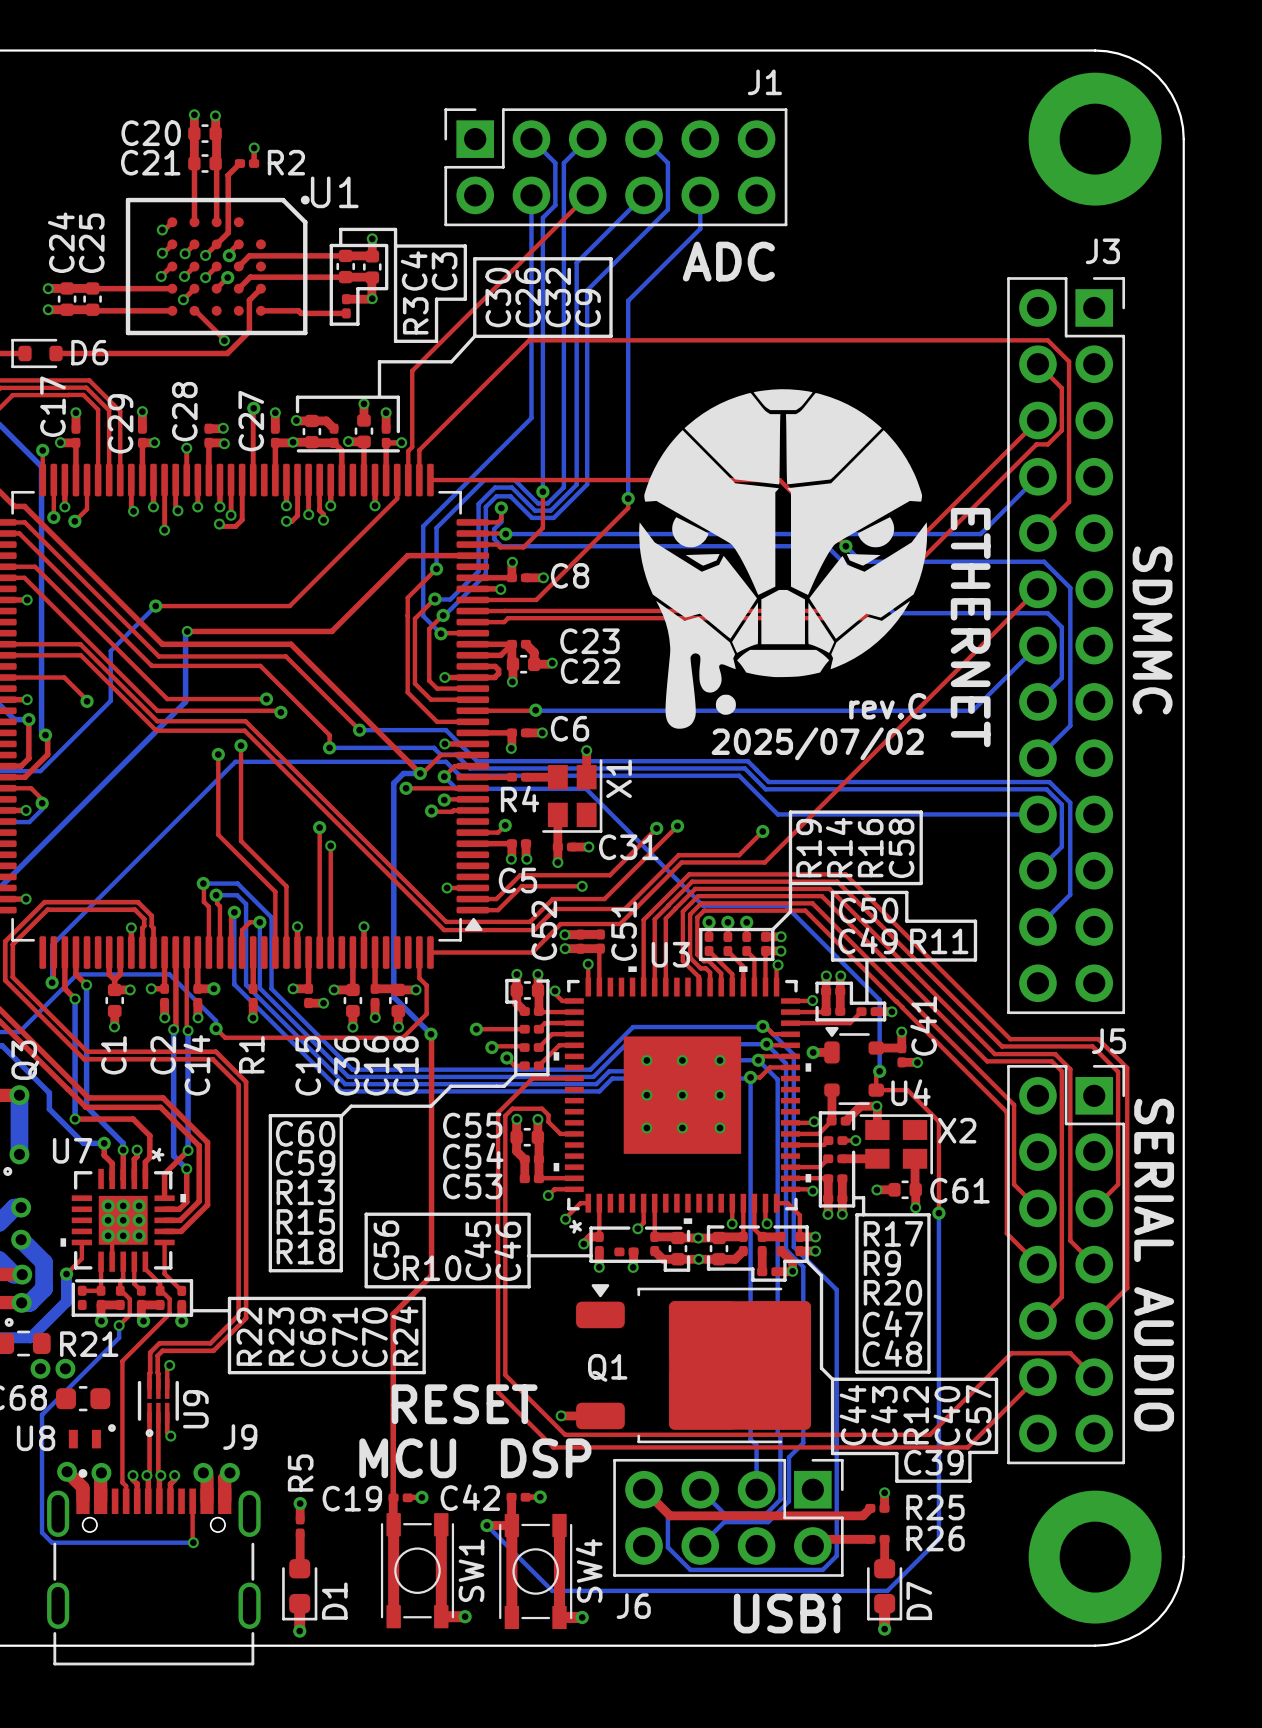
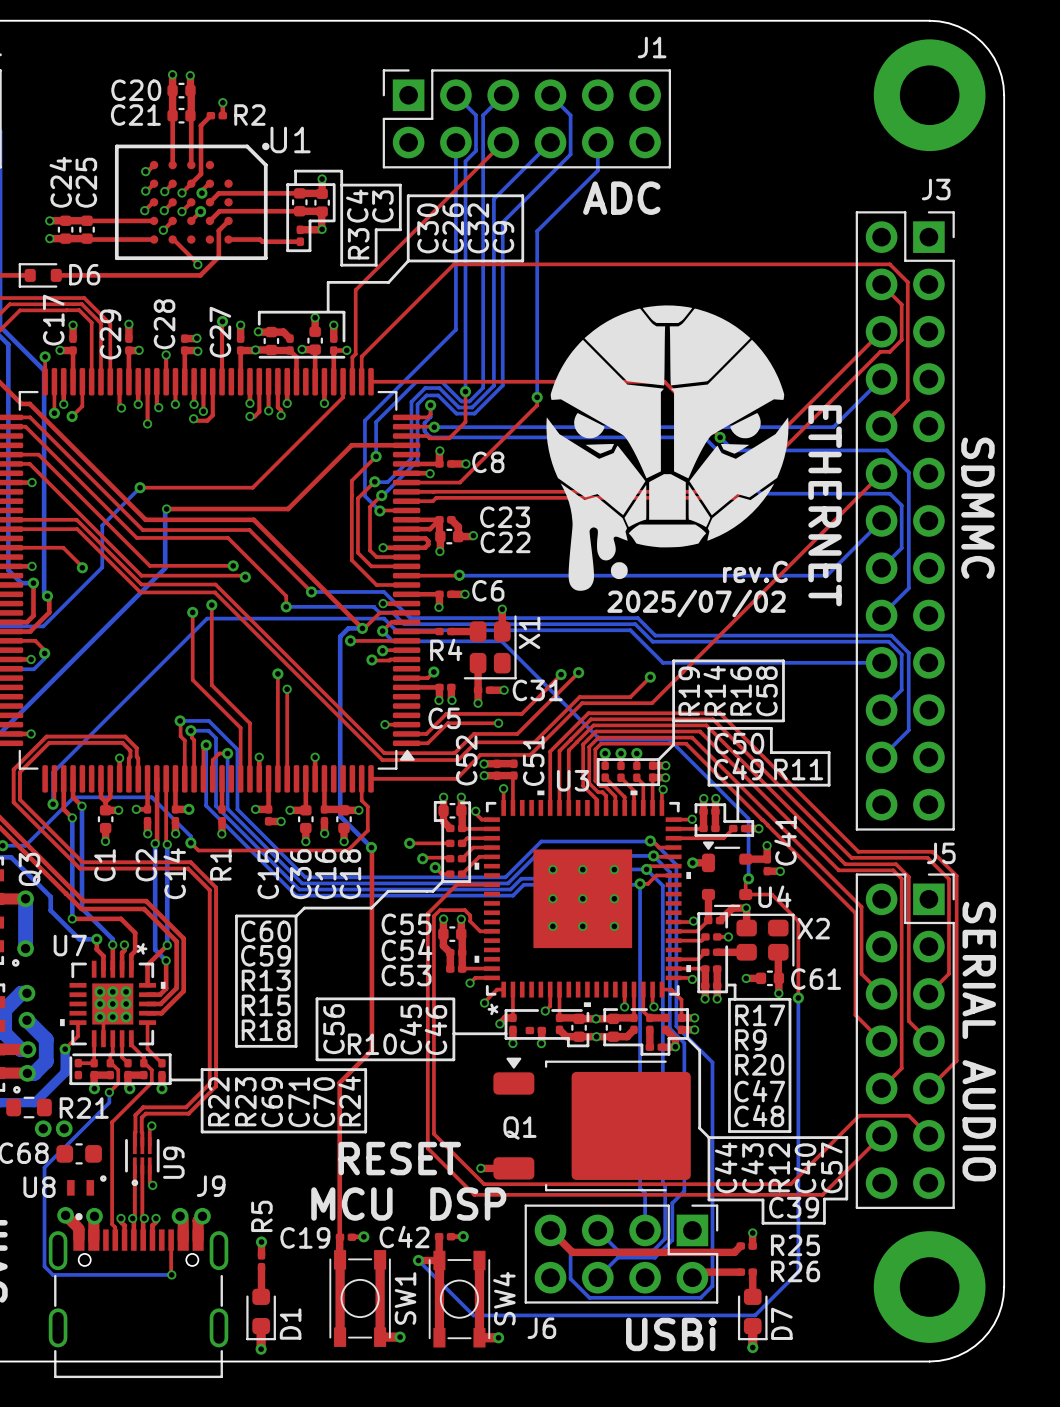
X1 footprint: [542, 759, 603, 833] -> [463, 615, 517, 680]
X2 footprint: [859, 1114, 933, 1175] -> [730, 913, 795, 967]
Q1 footprint: [576, 1284, 811, 1444] -> [493, 1057, 691, 1192]

